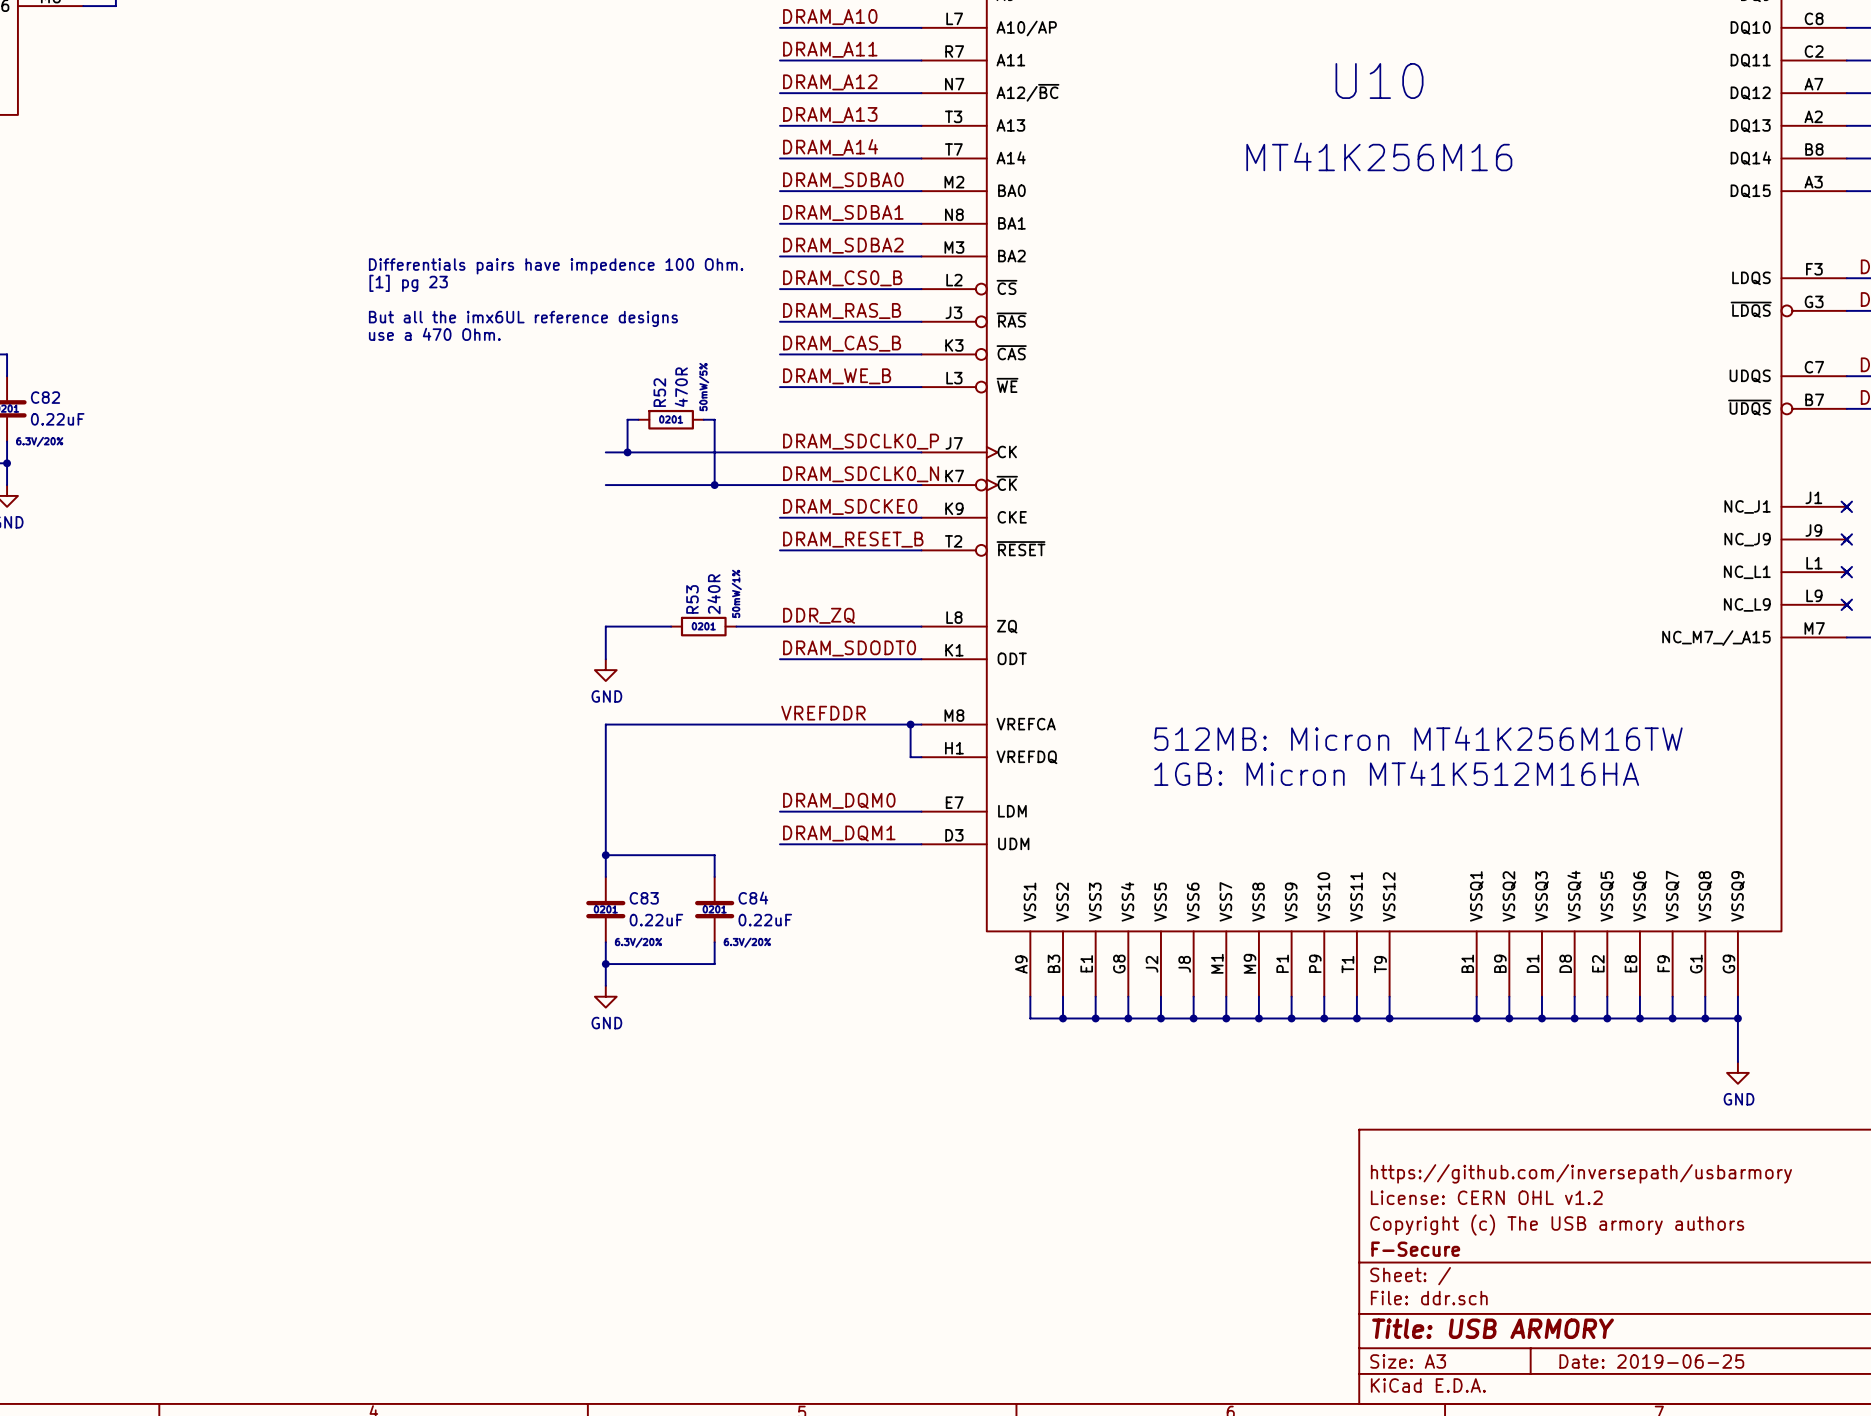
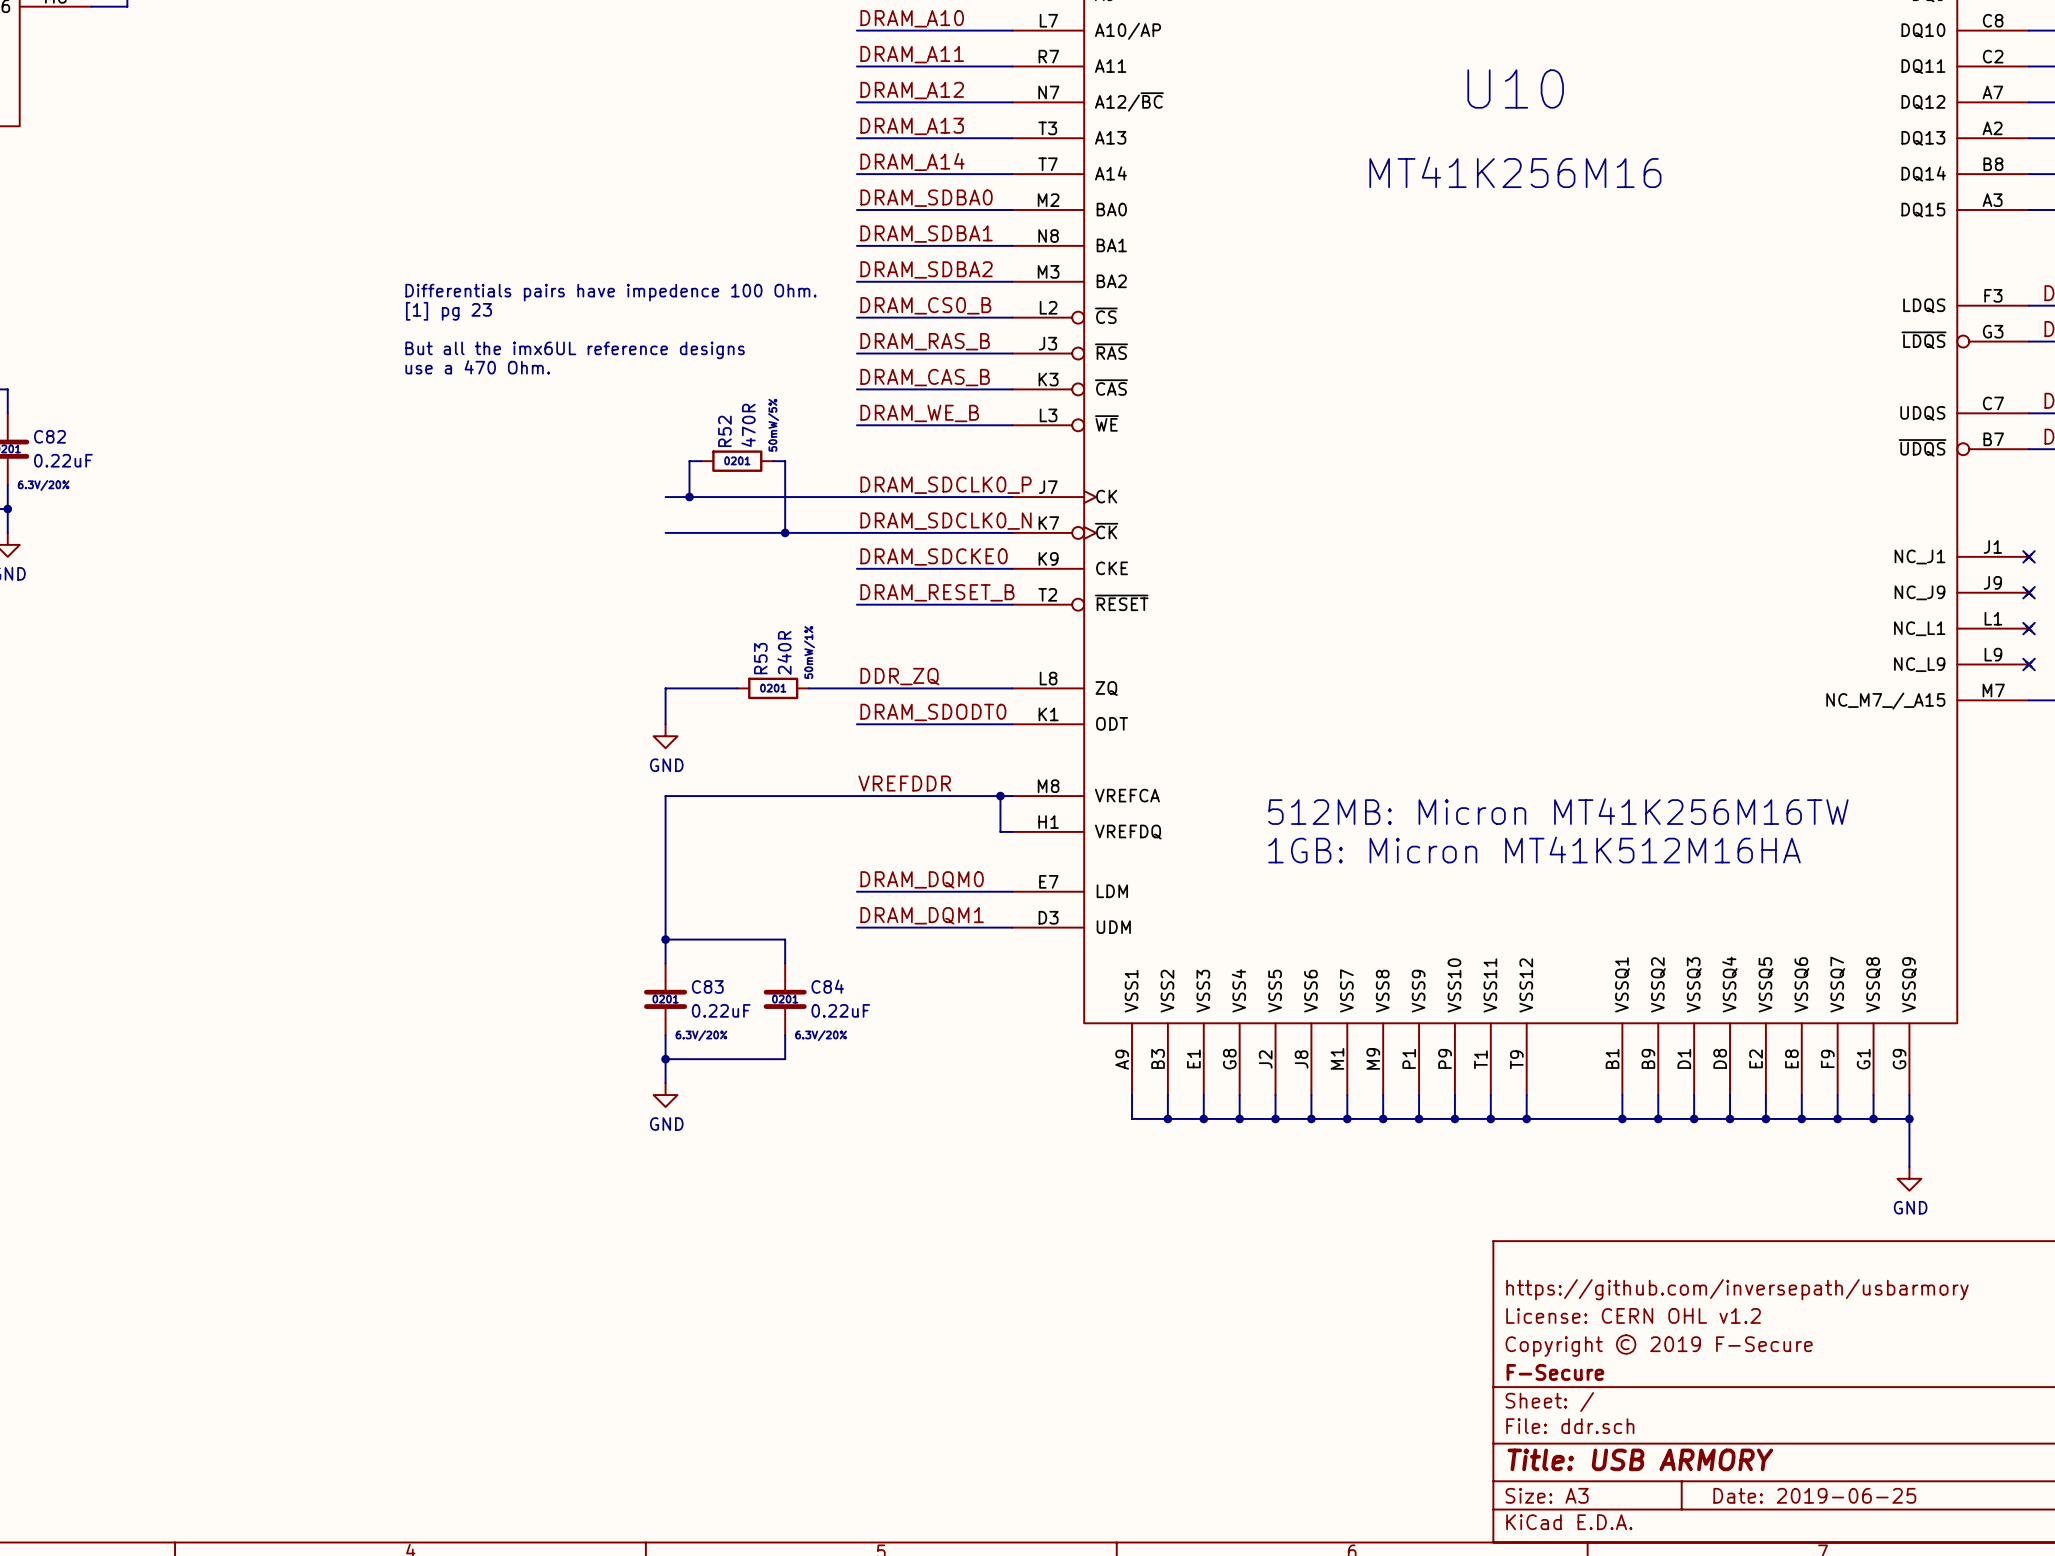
title block: Copyright (c) The USB armory authors (1557, 1225) -> Copyright © 2019 F-Secure (1659, 1345)

